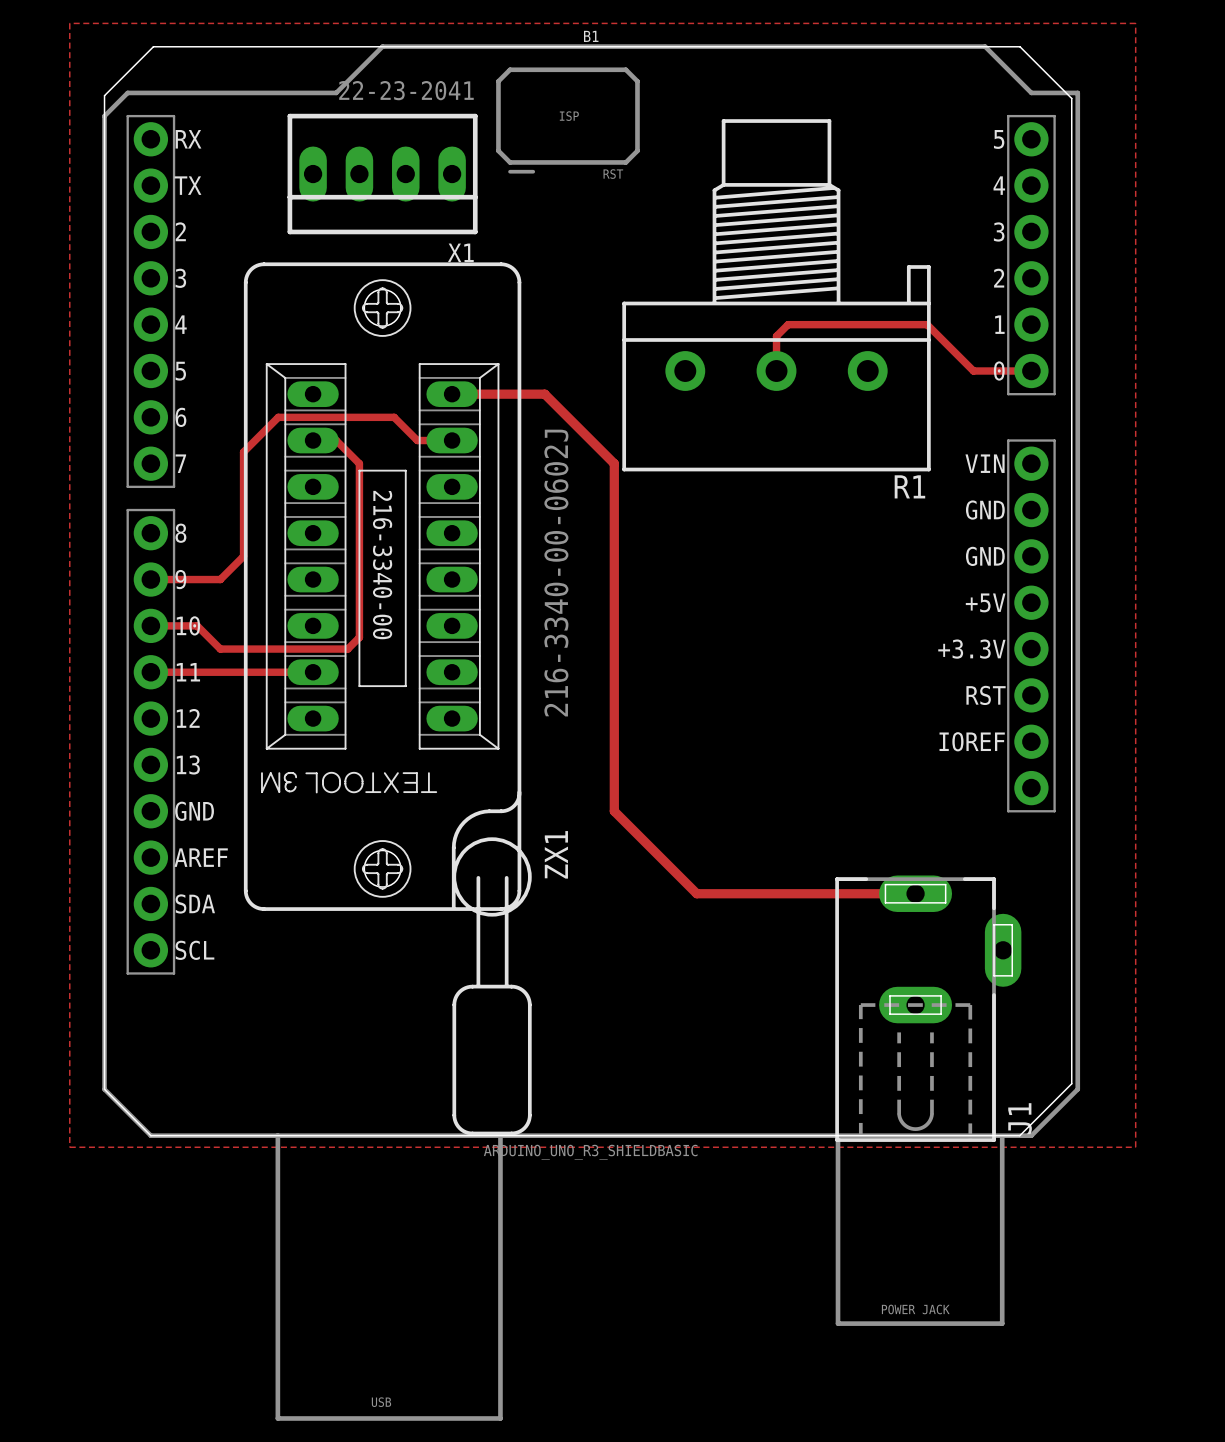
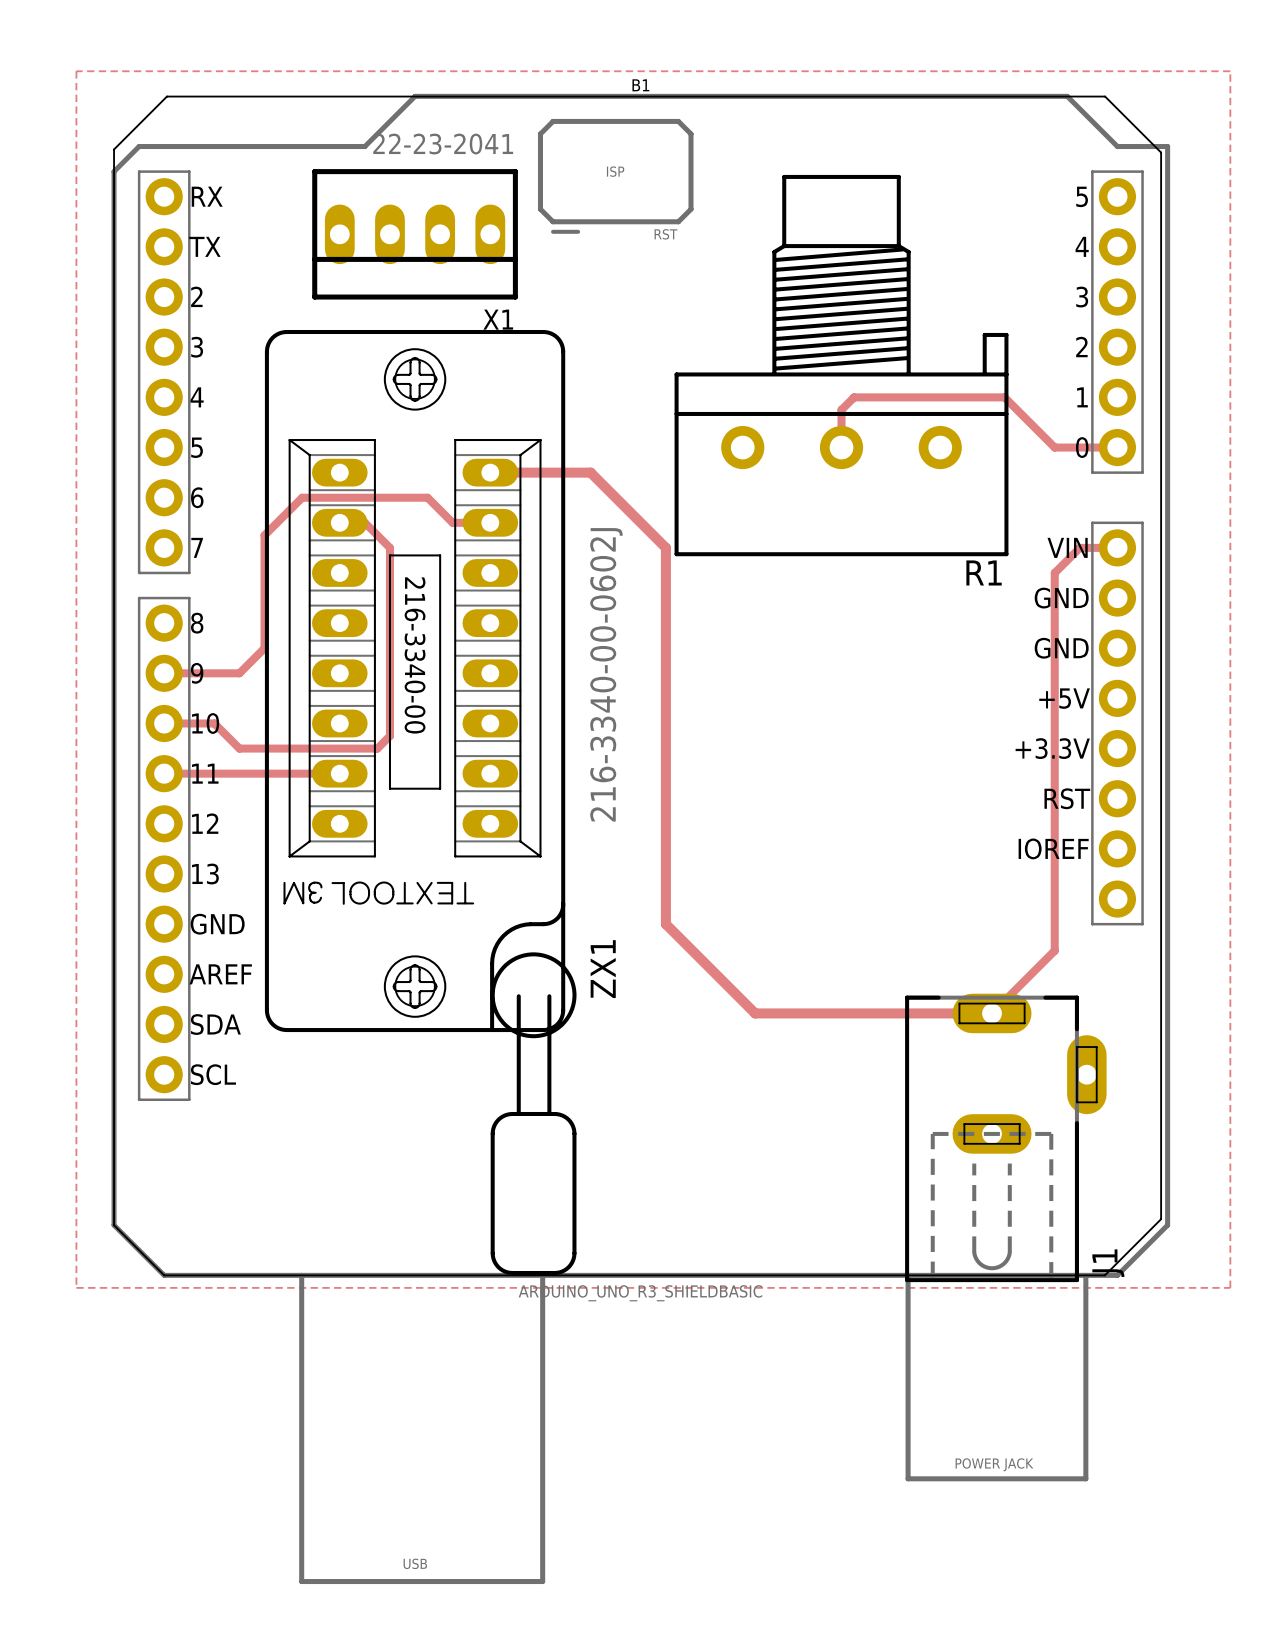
track: none -> (1117, 547) (1079, 547) (1054, 572) (1054, 950) (992, 1013)

